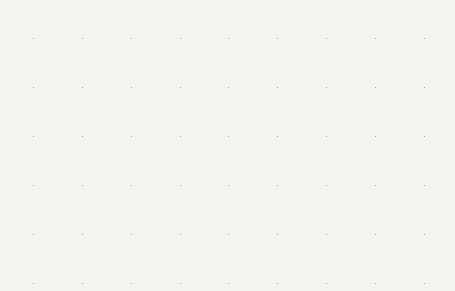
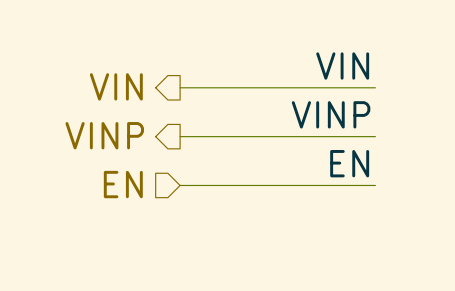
label: none -> VIN (342, 66)
hierarchical label: none -> VIN (116, 86)
wire: none -> (180, 87) (375, 87)
label: none -> VINP (331, 114)
hierarchical label: none -> VINP (104, 135)
wire: none -> (180, 136) (375, 136)
label: none -> EN (349, 163)
hierarchical label: none -> EN (123, 184)
wire: none -> (180, 185) (375, 185)

